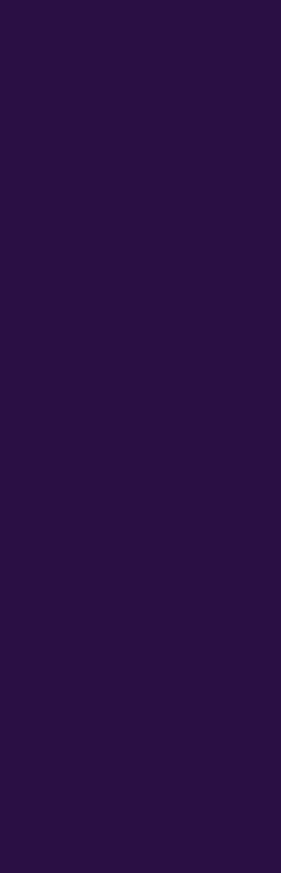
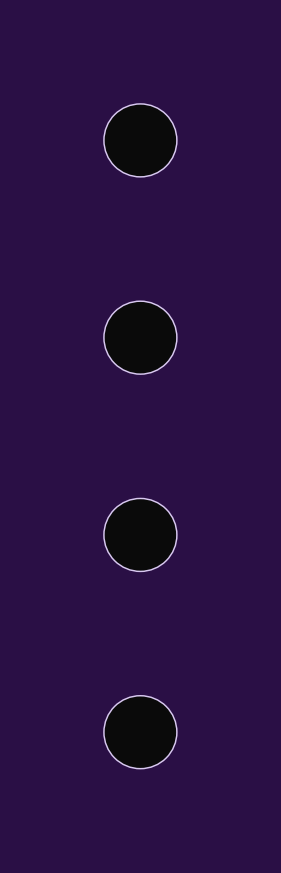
part: none -> (140, 140)
part: none -> (140, 337)
part: none -> (140, 534)
part: none -> (140, 732)

